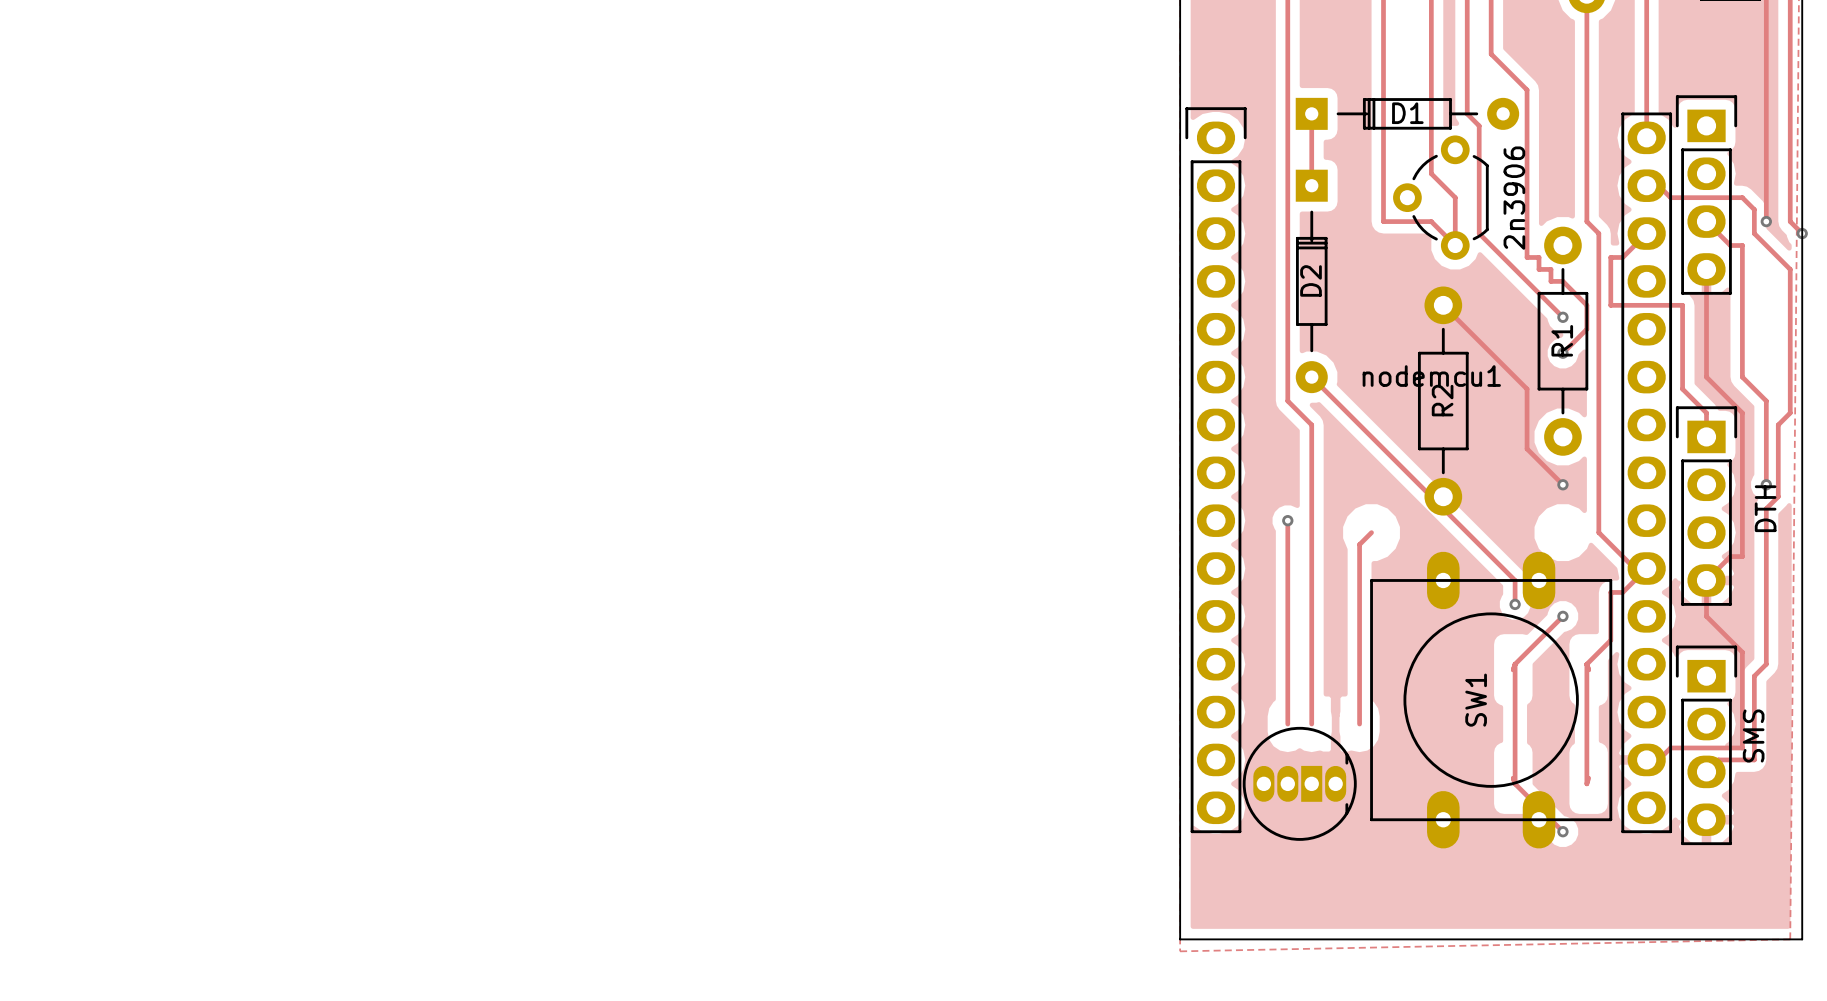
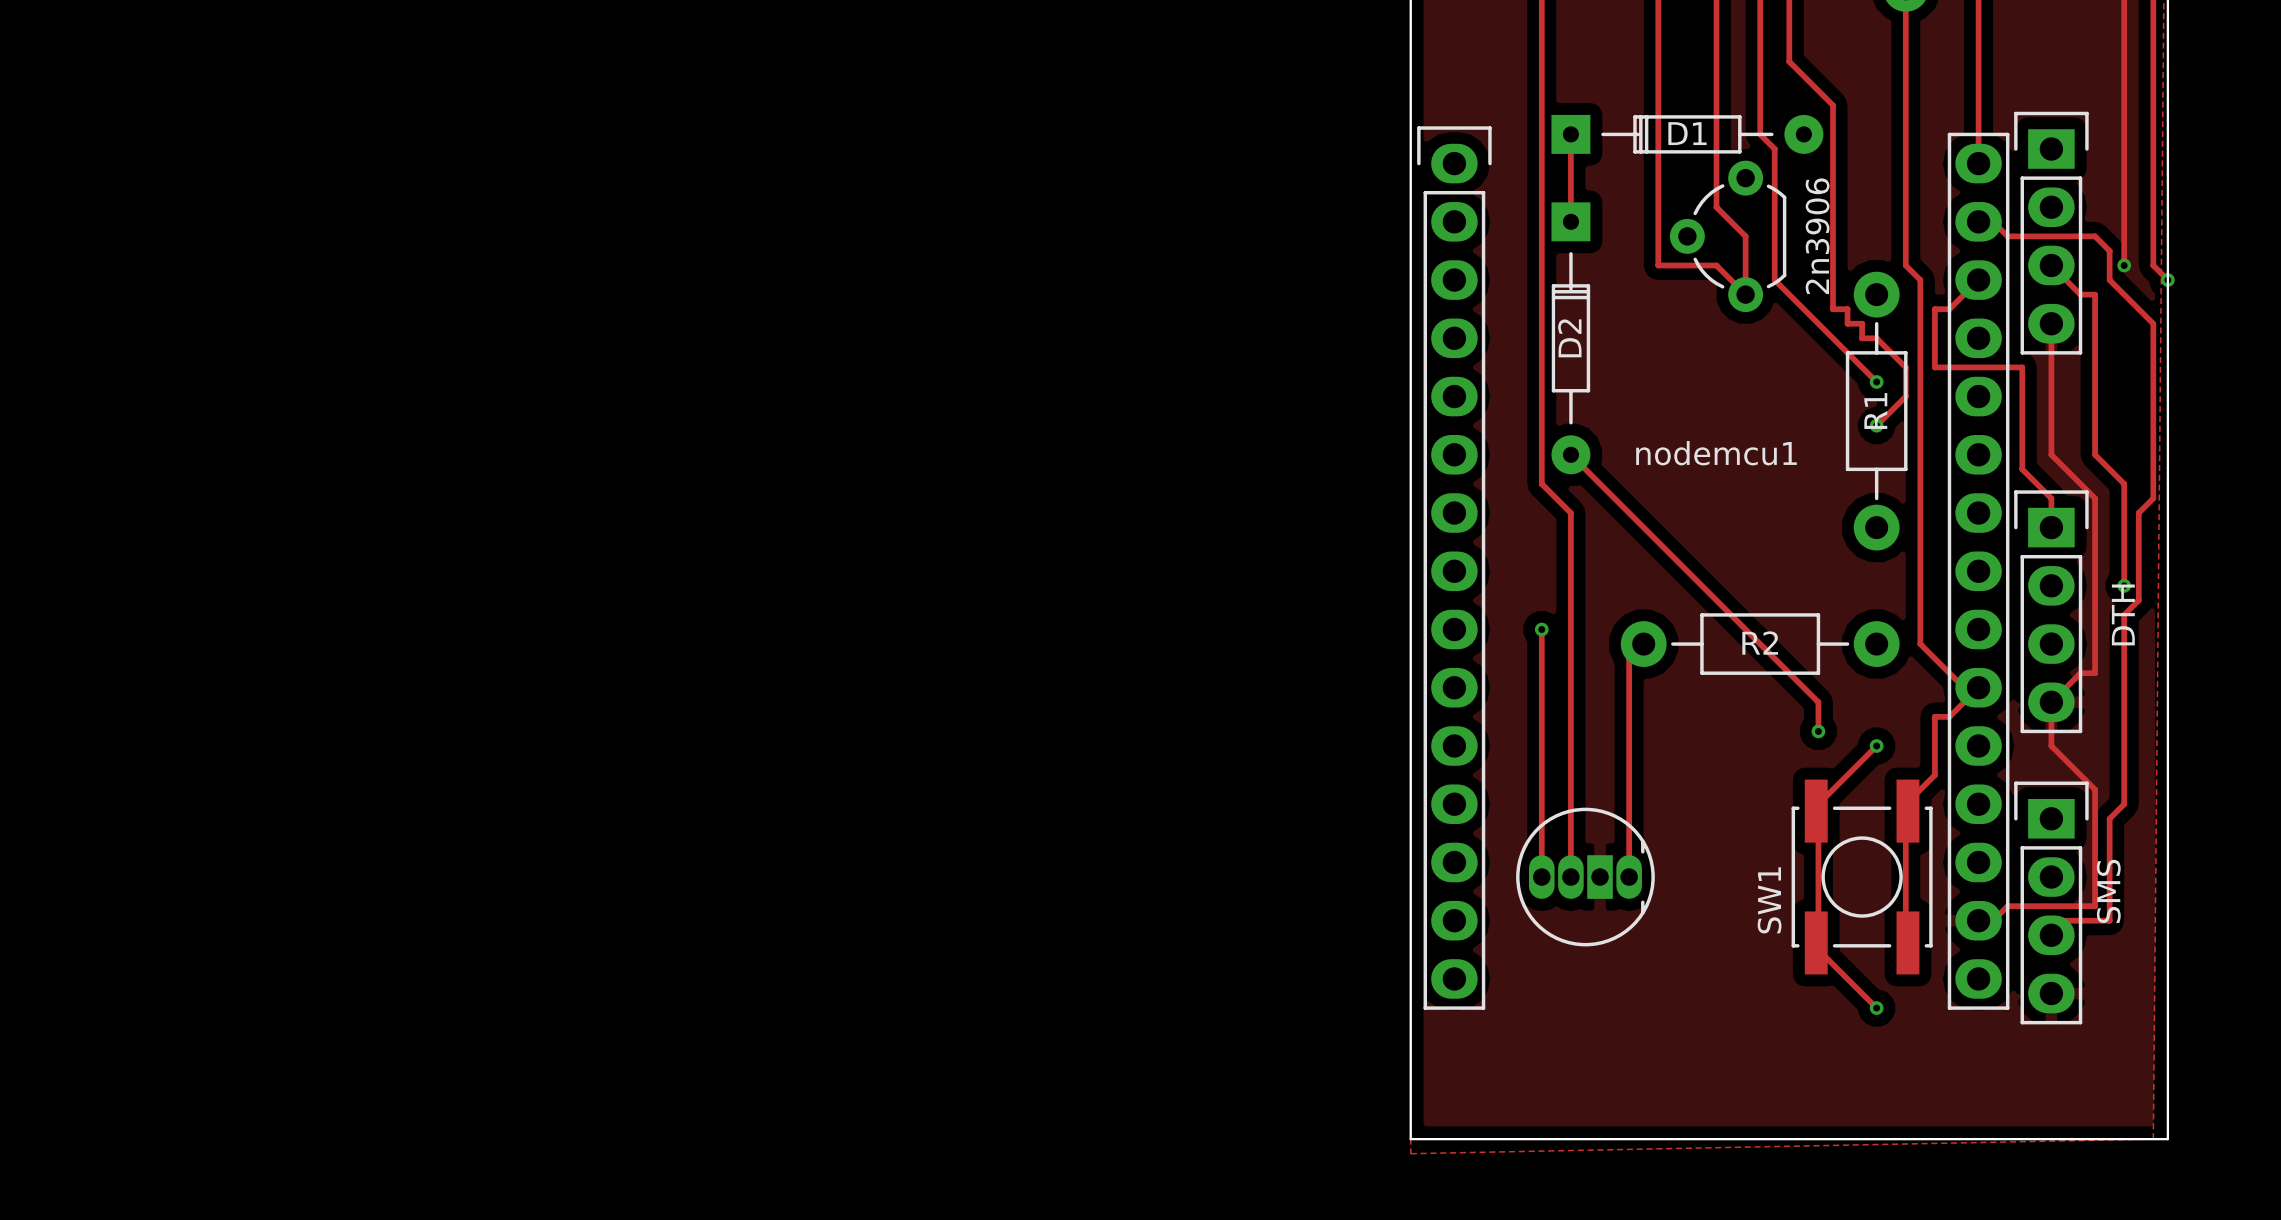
track: (1443, 305) (1527, 389) (1527, 448) (1562, 484) -> none
R2 rotation: 0° (1443, 401) -> 90° clockwise (1760, 644)
via: (1562, 484) -> none
SW1 footprint: [1370, 551, 1613, 849] -> [1791, 779, 1933, 975]
SW1 name position: SW1 (1476, 700) -> SW1 (1769, 900)
part position: (1299, 783) -> (1585, 877)

